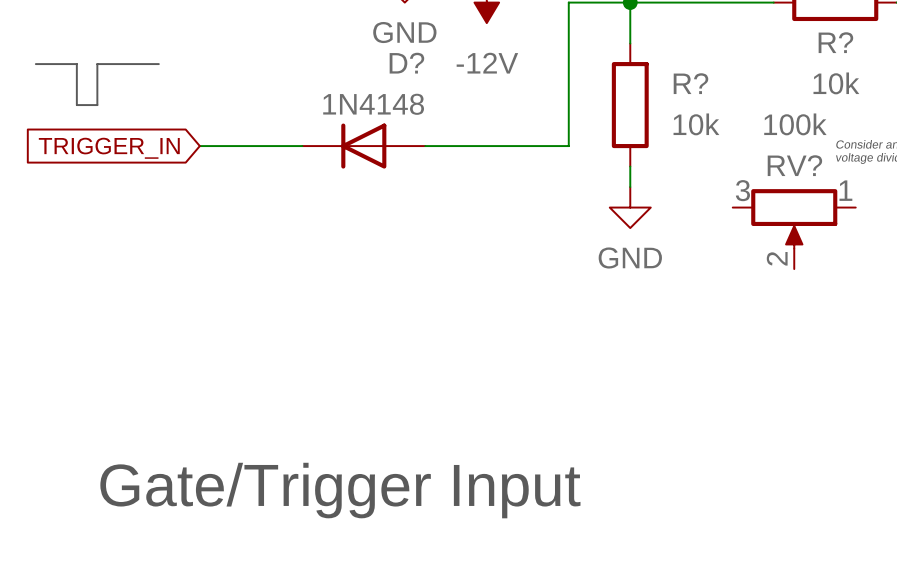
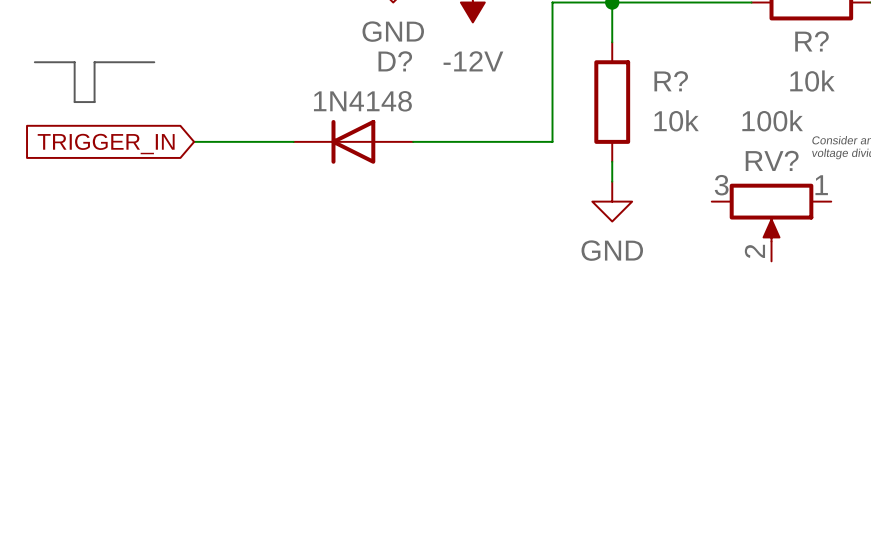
text: Gate/Trigger Input (340, 490) -> none

